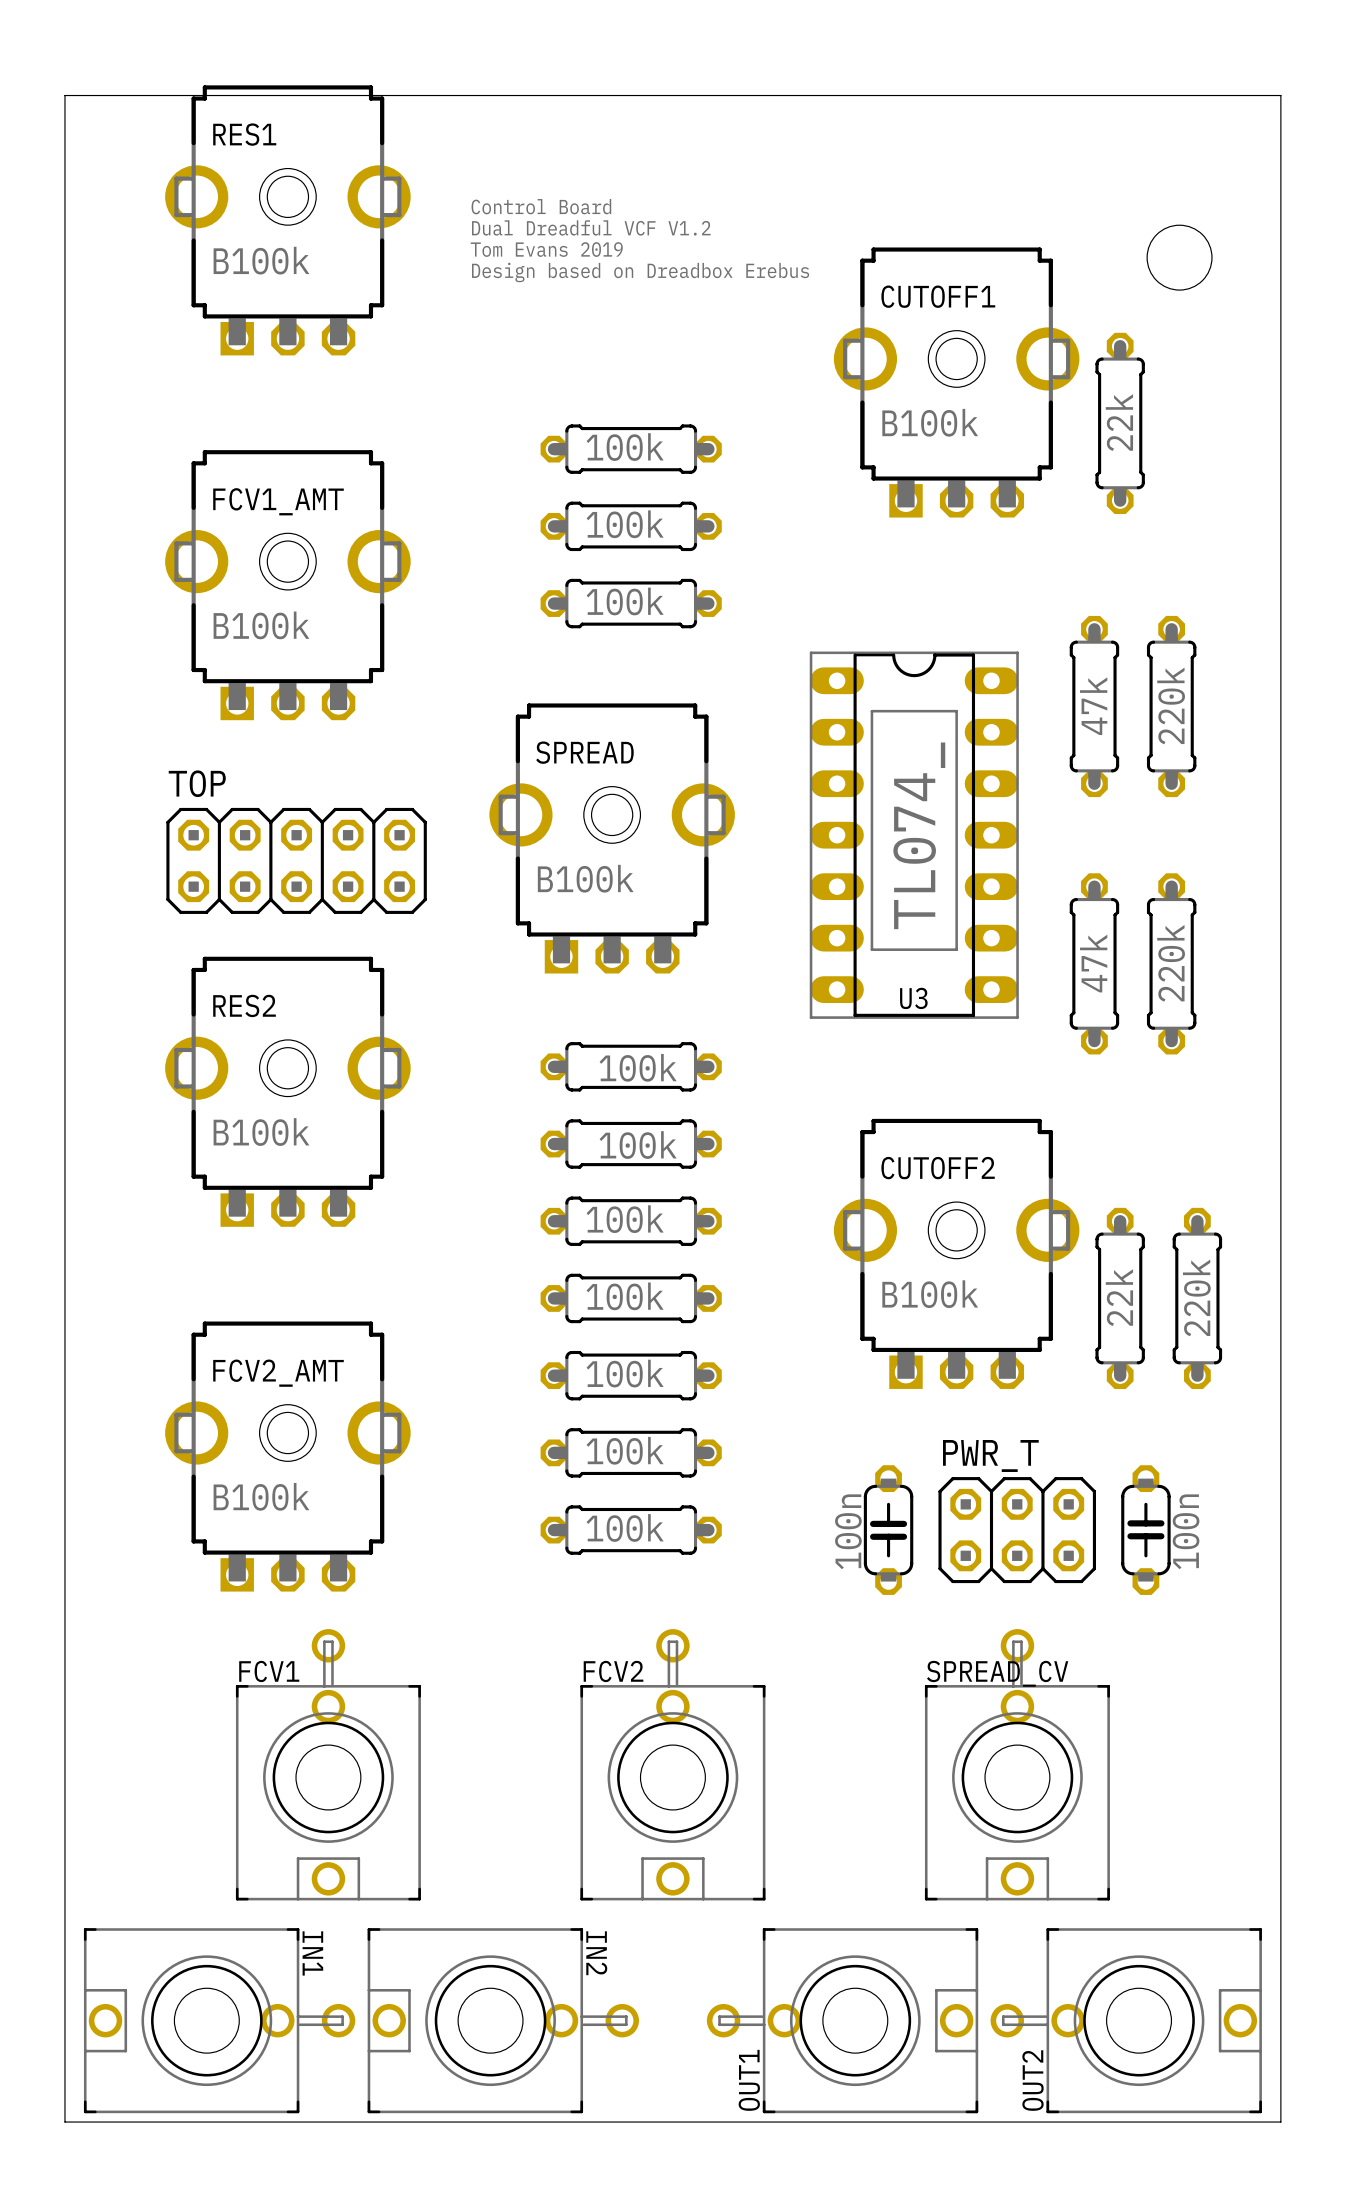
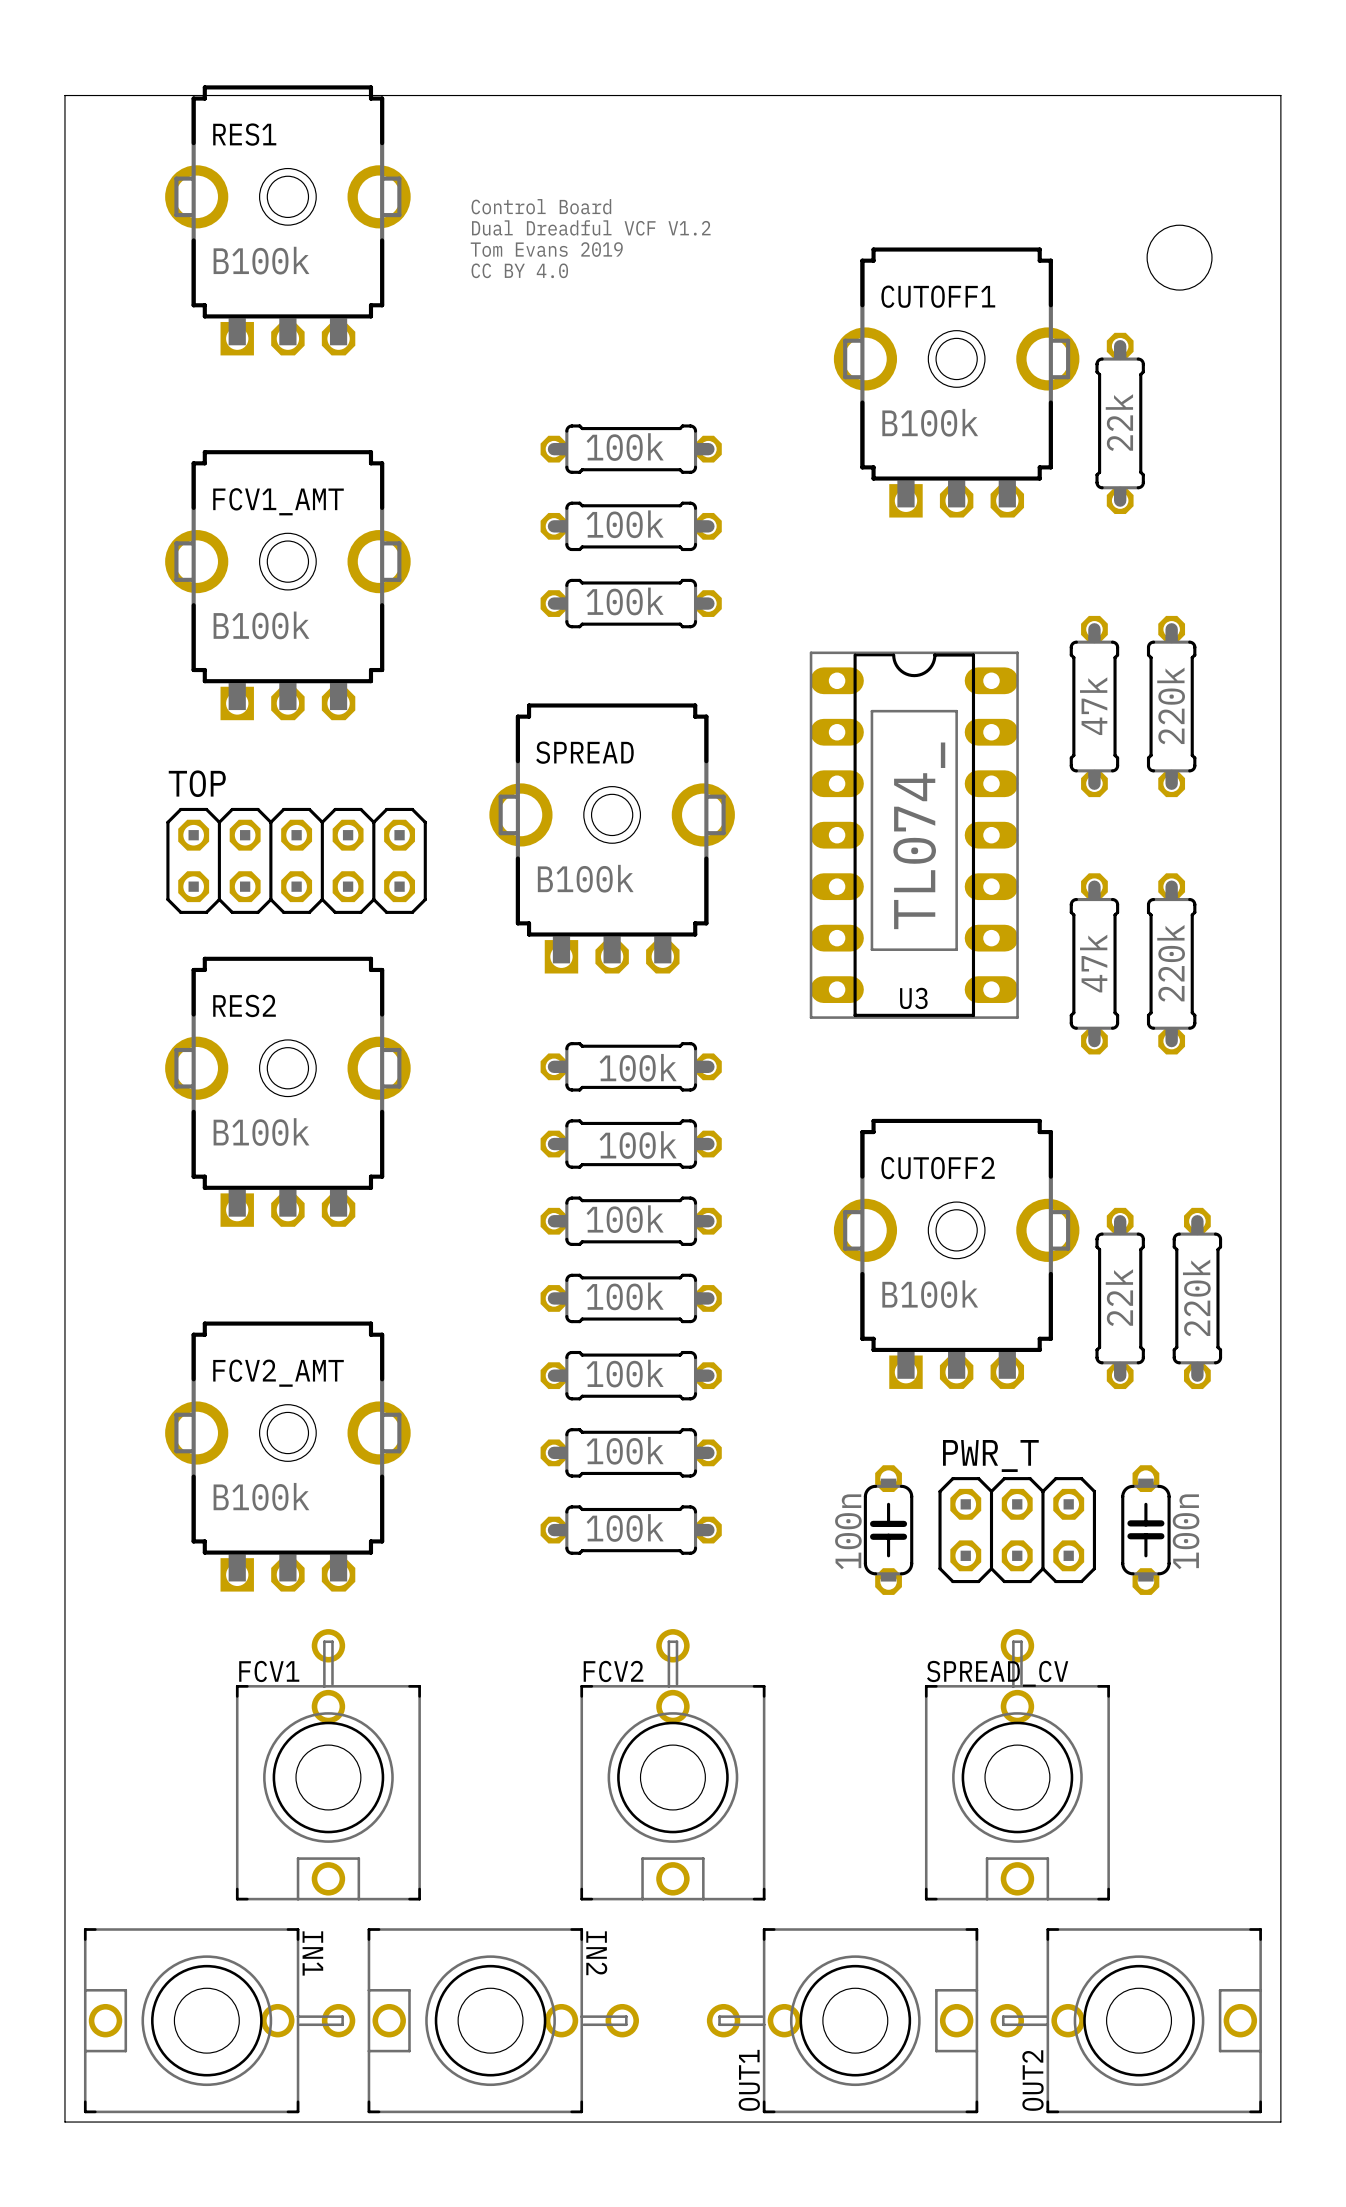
text: Design based on Dreadbox Erebus (640, 272) -> CC BY 4.0 (519, 270)

